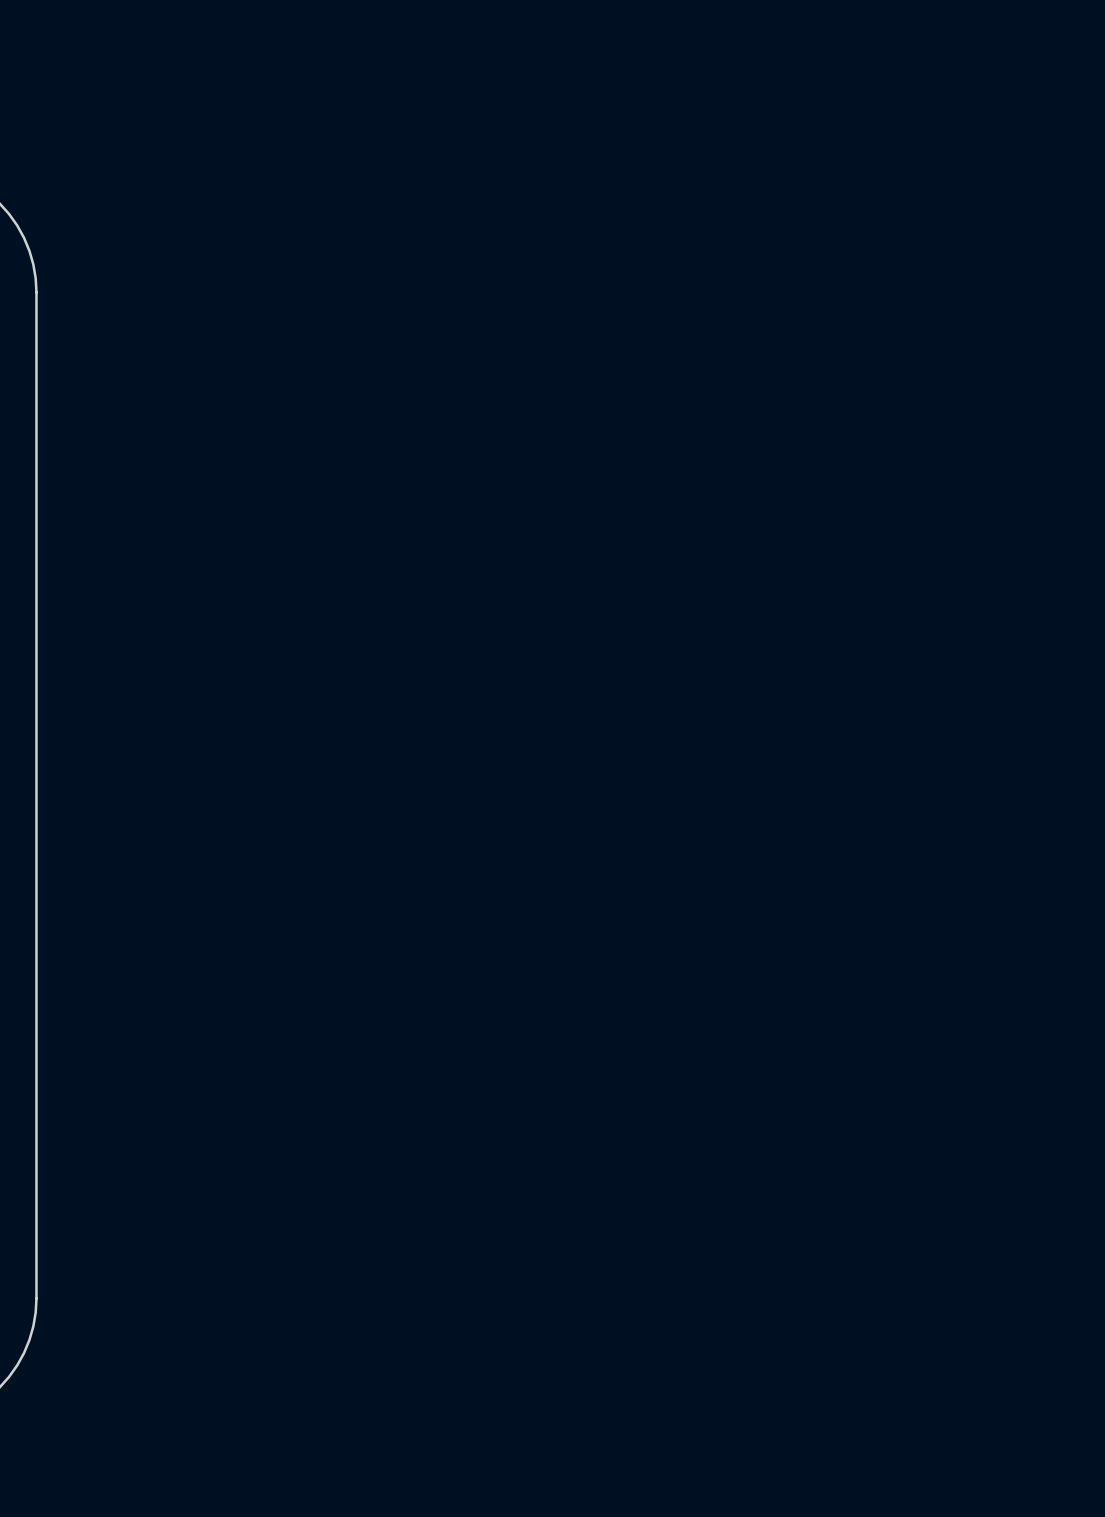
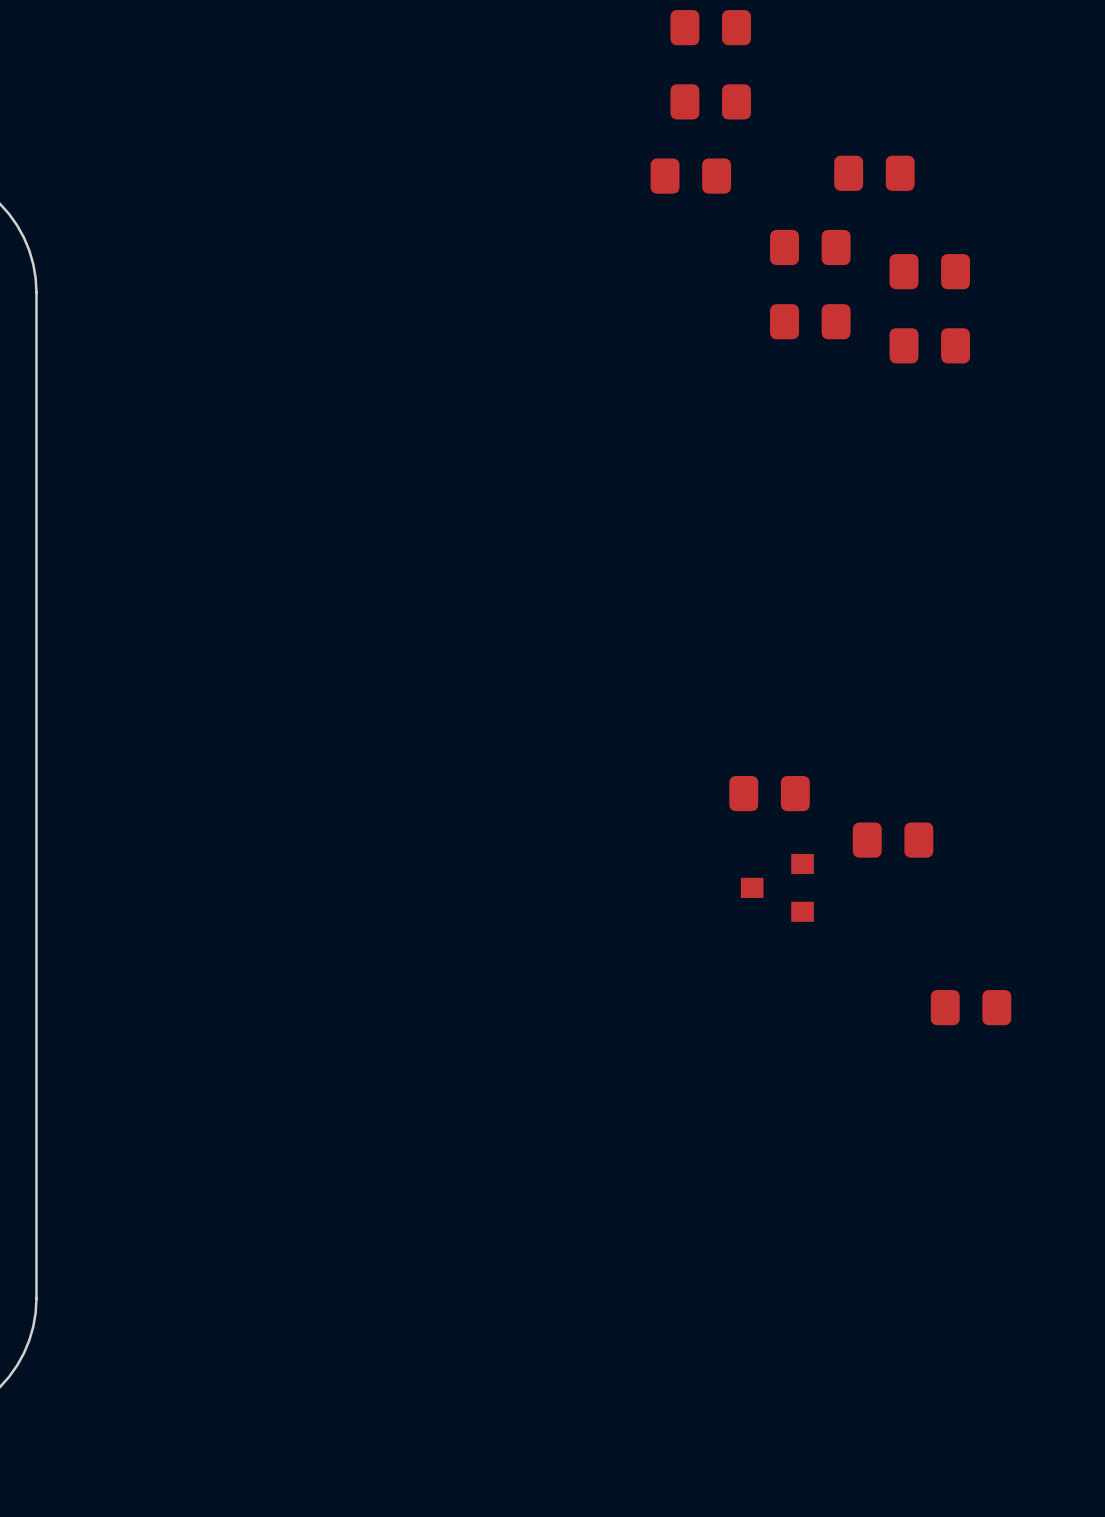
part: none -> (710, 27)
part: none -> (710, 101)
part: none -> (874, 173)
part: none -> (690, 176)
part: none -> (810, 247)
part: none -> (929, 271)
part: none -> (810, 321)
part: none -> (929, 345)
part: none -> (769, 793)
part: none -> (893, 840)
part: none -> (777, 887)
part: none -> (971, 1007)

